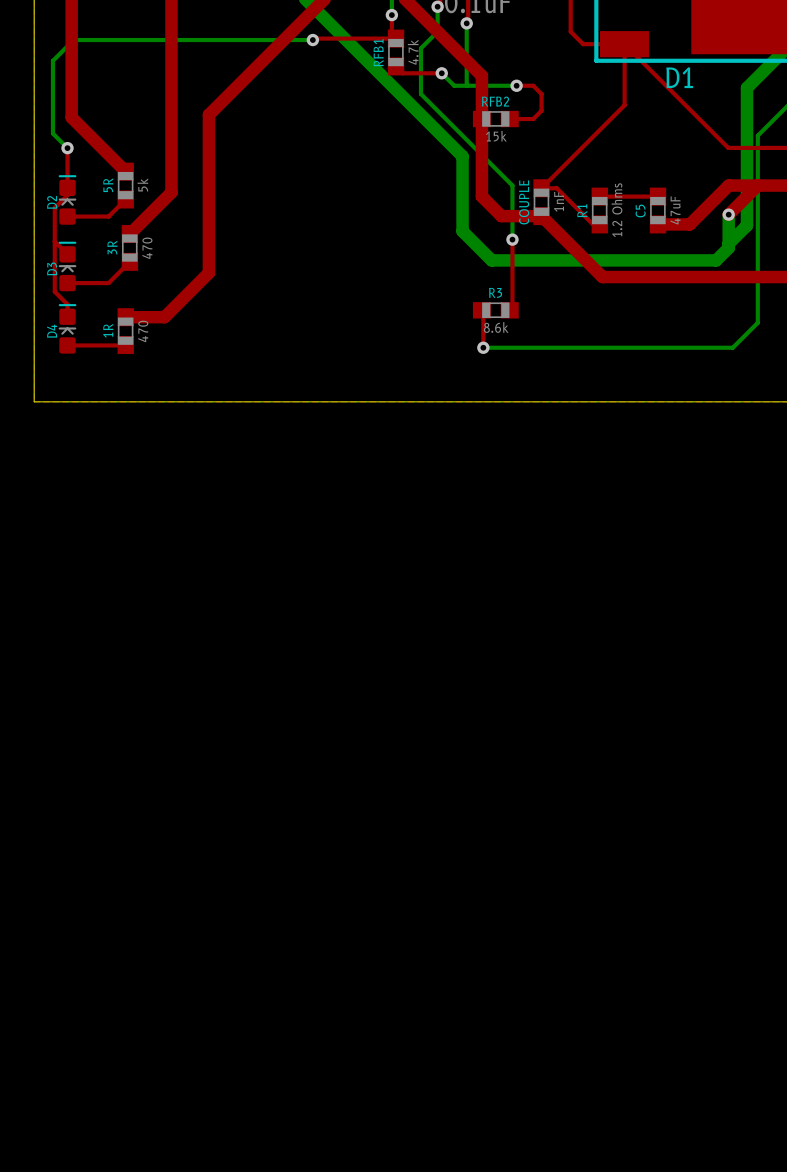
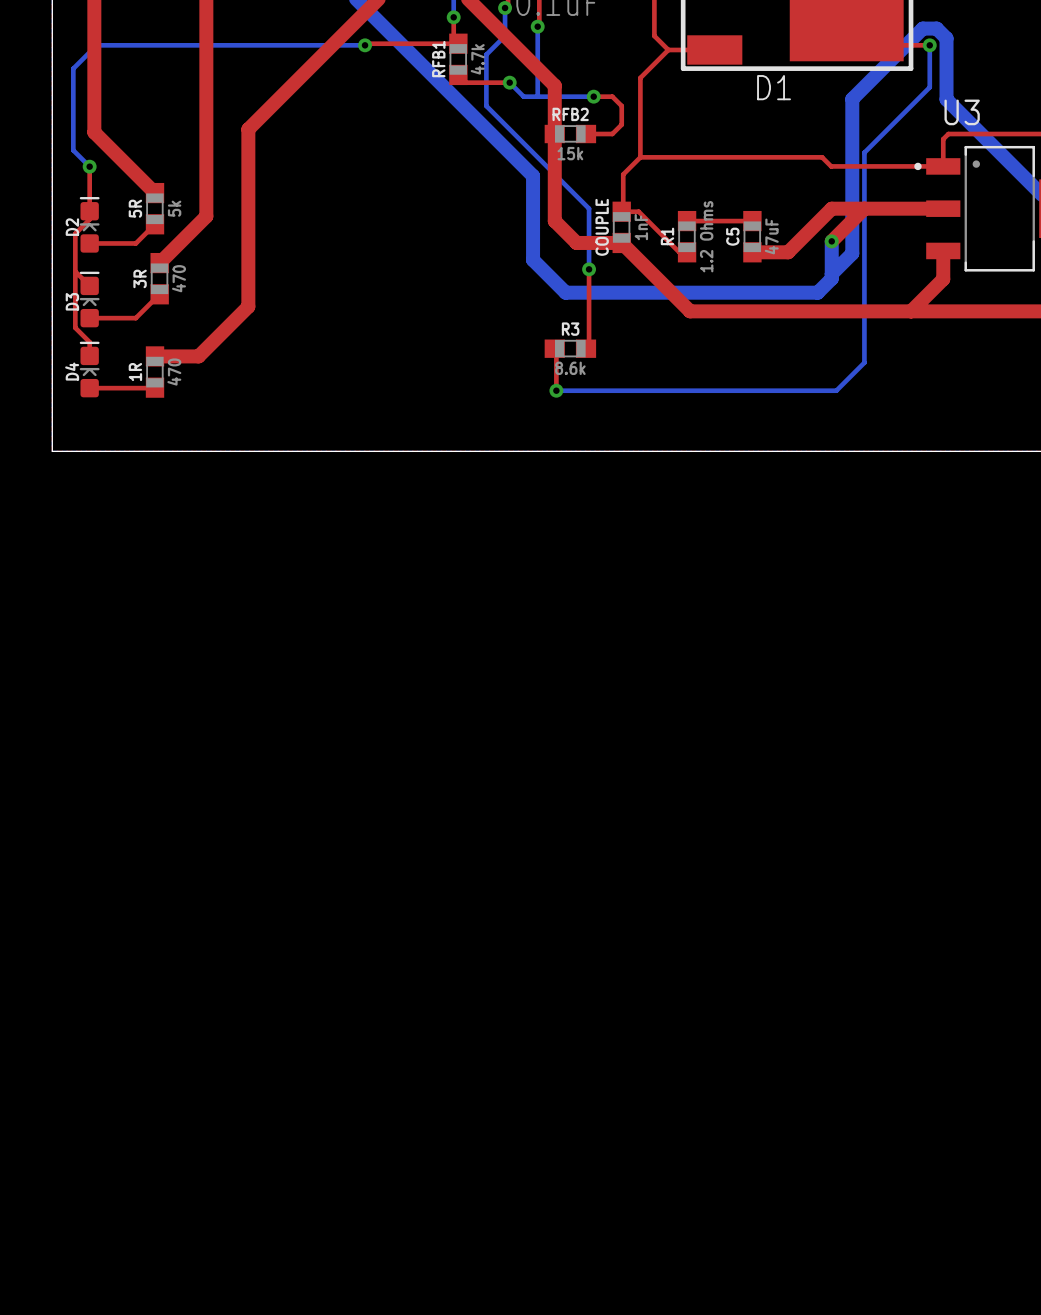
top track: none -> (668, 49) (640, 77) (640, 157)
top track: none -> (640, 157) (623, 174) (623, 210)
top track: (720, 139) (624, 44) (624, 105) (542, 186) -> (822, 157) (640, 157)

